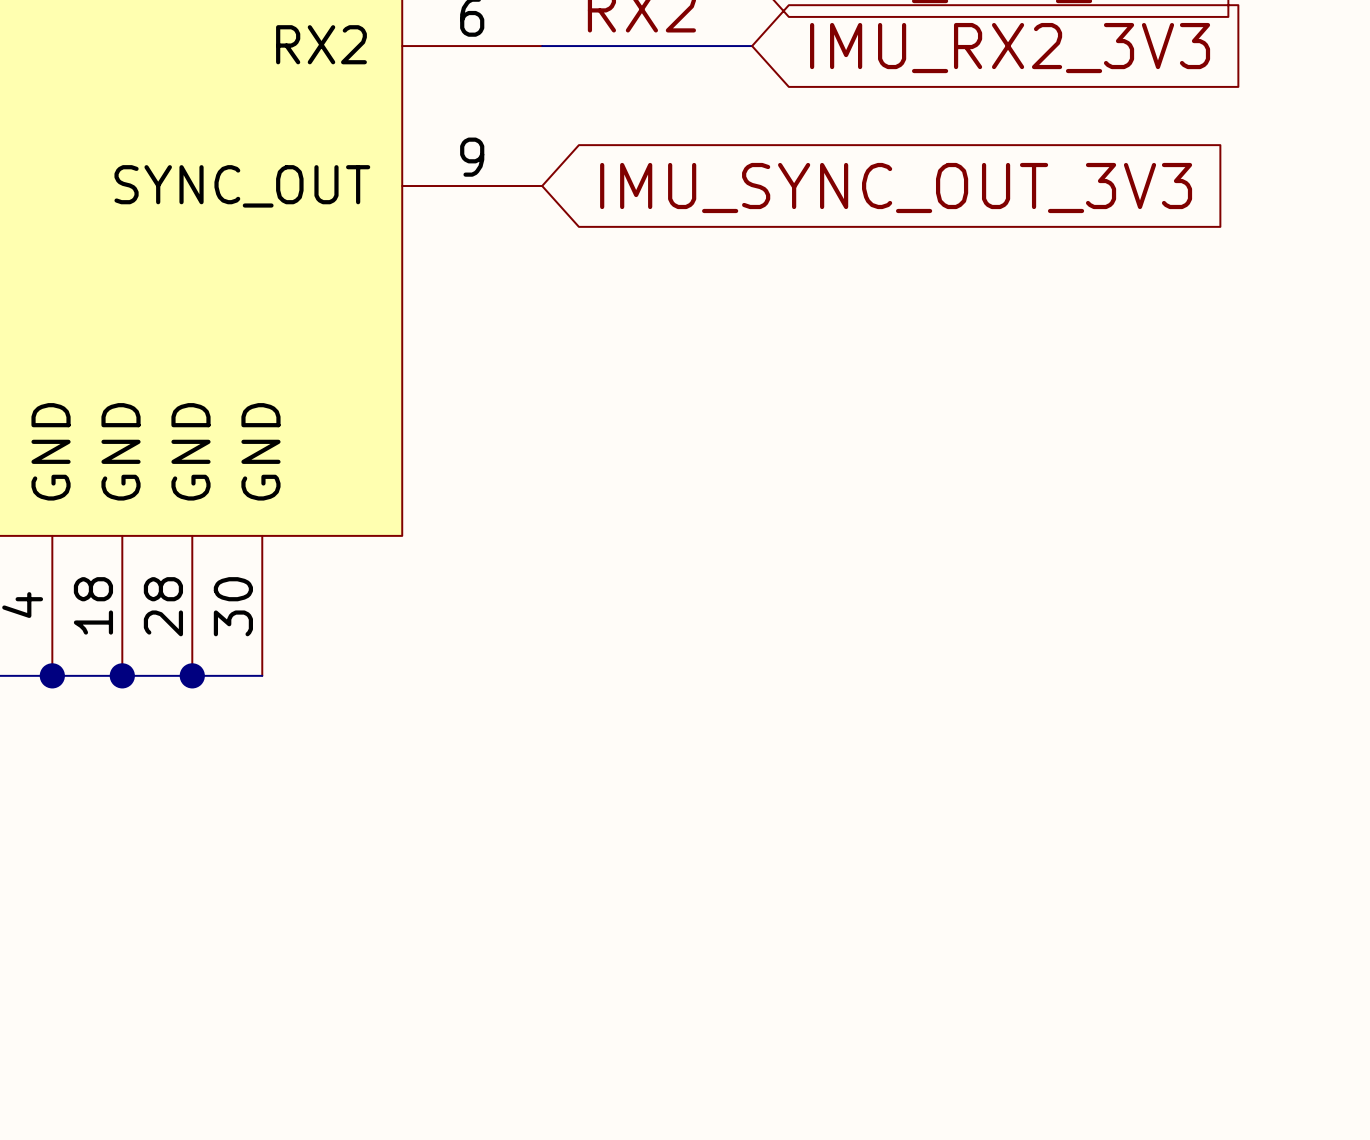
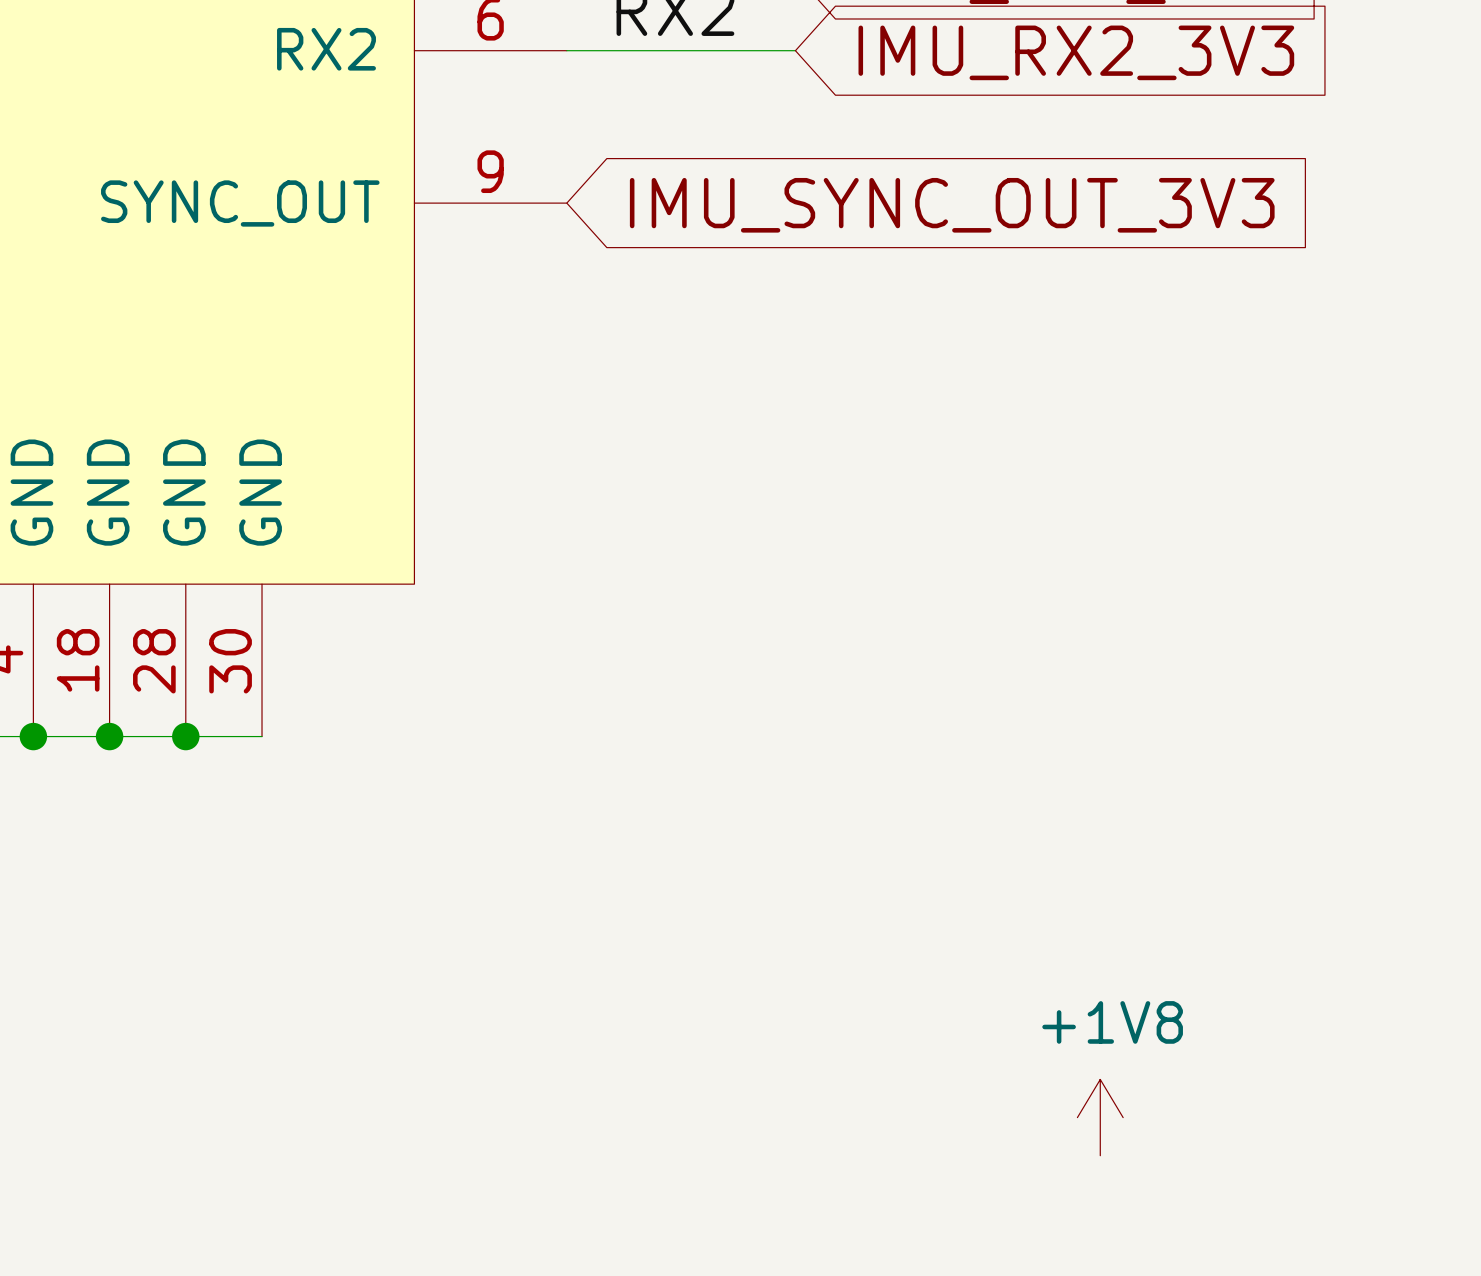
power symbol: none -> +1V8 (1100, 1117)

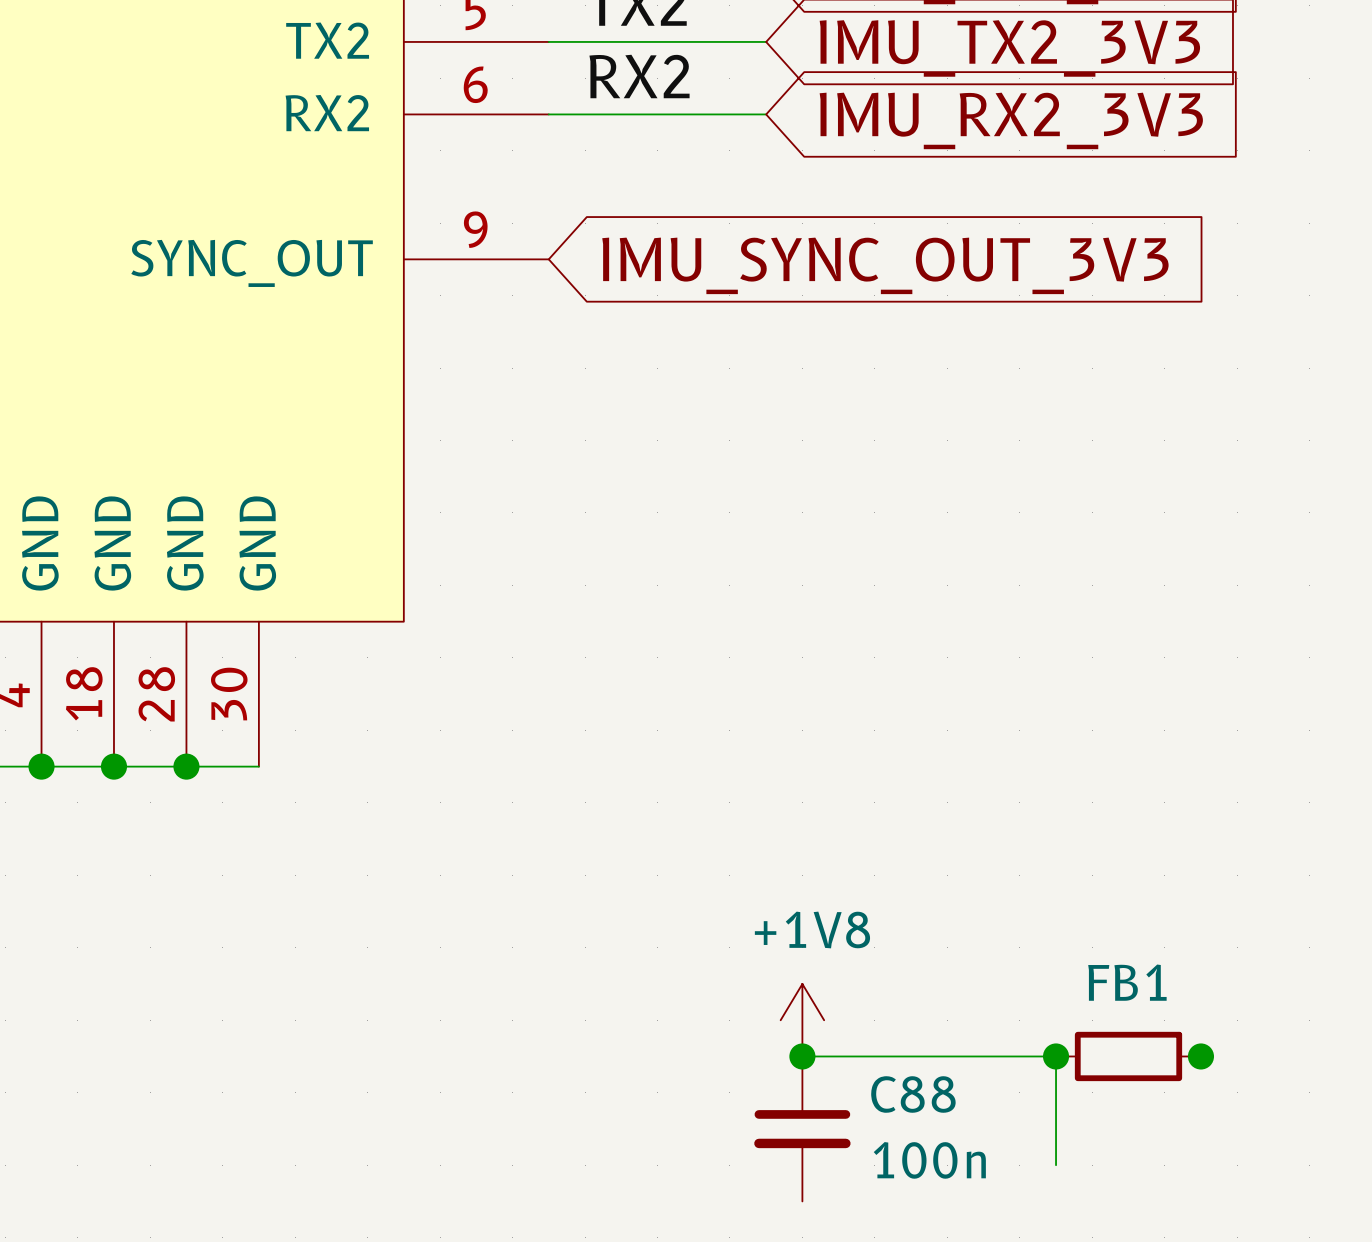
wire: none -> (802, 1056) (1056, 1056) (1056, 1165)
junction: none -> (802, 1056)
junction: none -> (1056, 1056)
FB1: none -> (1128, 1056)
junction: none -> (1200, 1056)
C88: none -> 100n (802, 1128)
power symbol position: +1V8 (1100, 1117) -> +1V8 (802, 1020)

